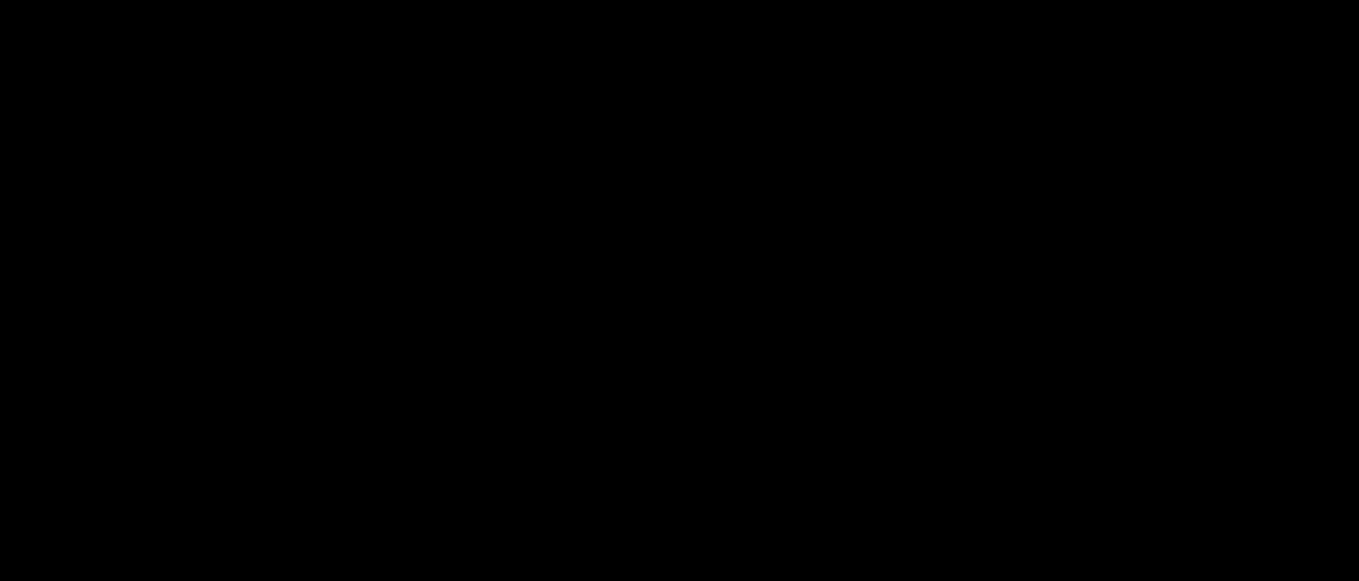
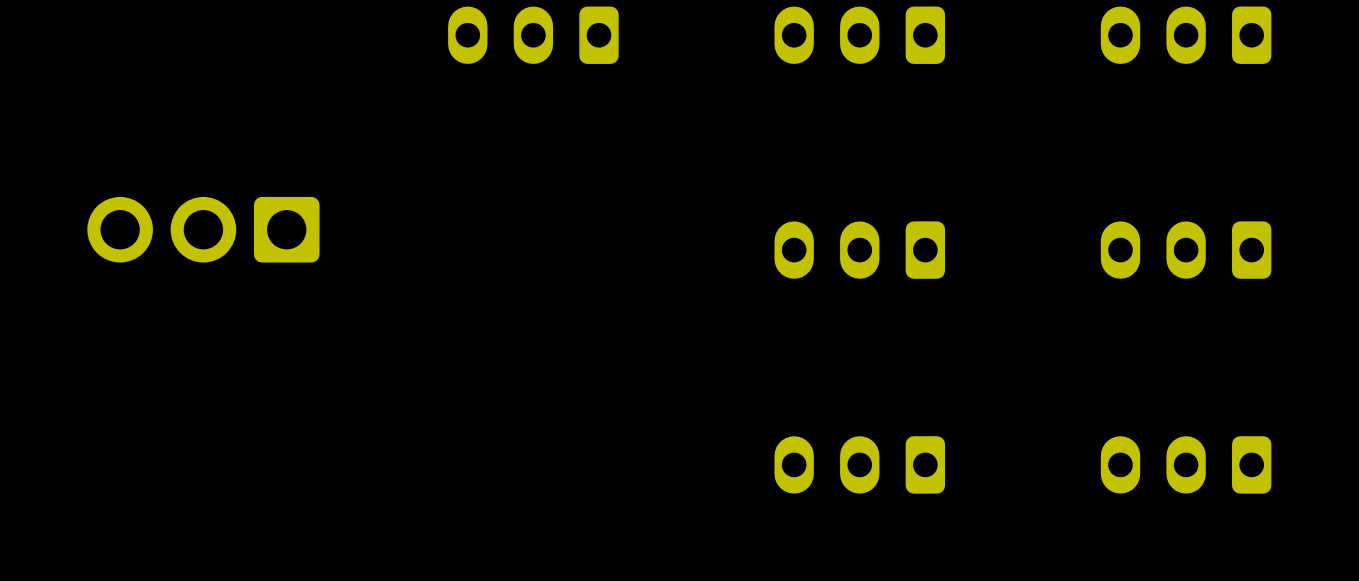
part: none -> (533, 35)
part: none -> (859, 35)
part: none -> (1186, 35)
part: none -> (203, 229)
part: none -> (859, 250)
part: none -> (1186, 250)
part: none -> (859, 464)
part: none -> (1186, 464)

